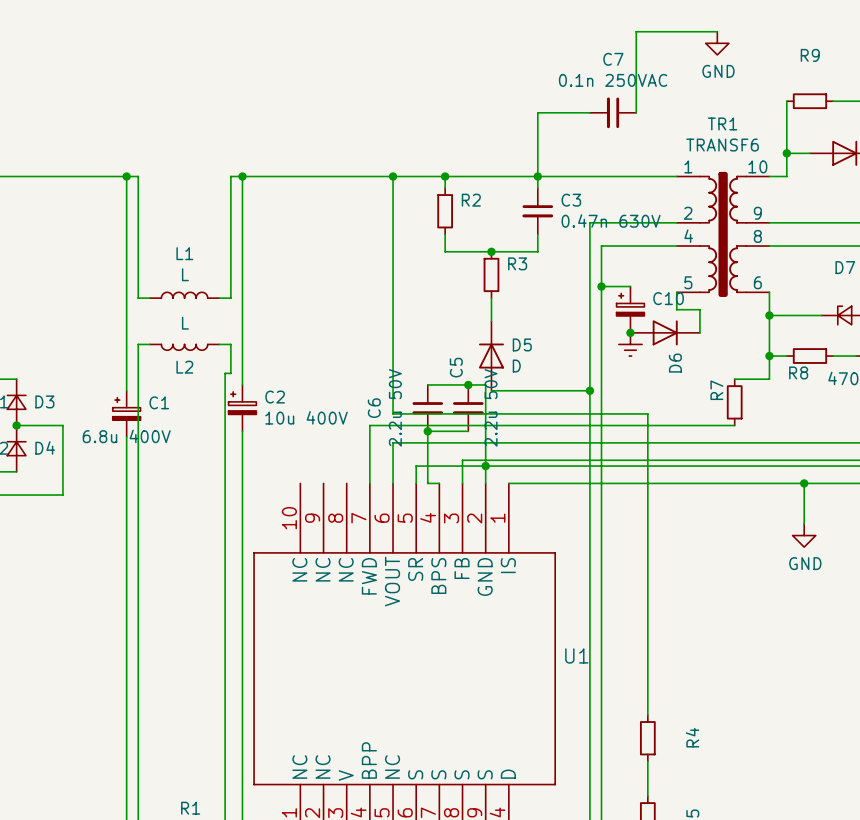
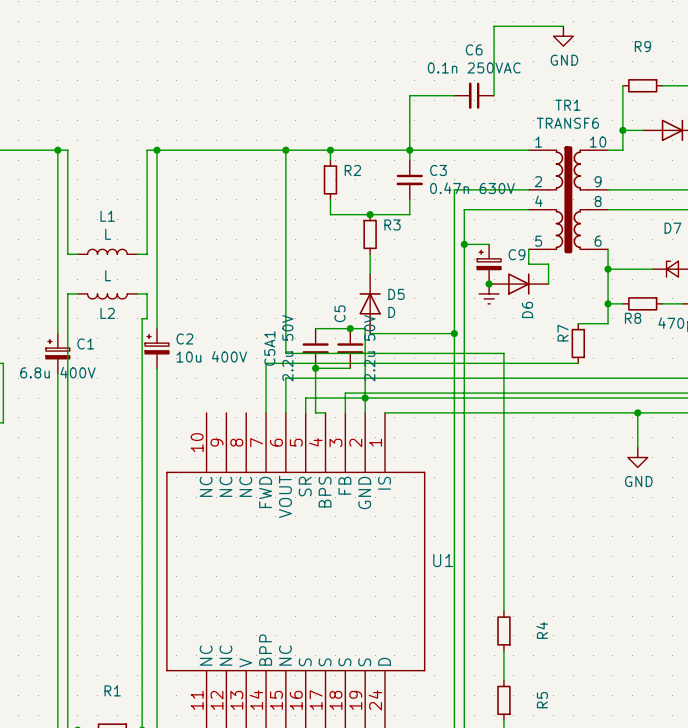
C7 name: C7 (613, 59) -> C6 (474, 49)
C10 name: C10 (668, 298) -> C9 (516, 254)
C6 name: C6 (374, 408) -> C5A1 (269, 348)

